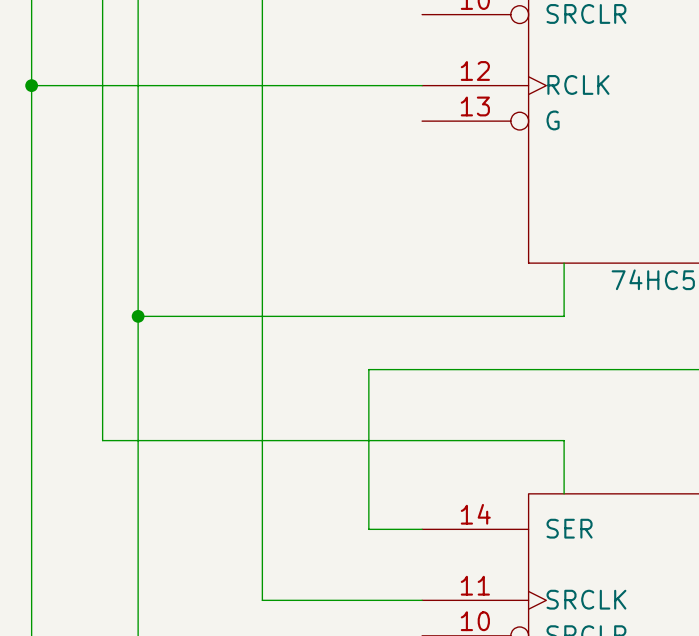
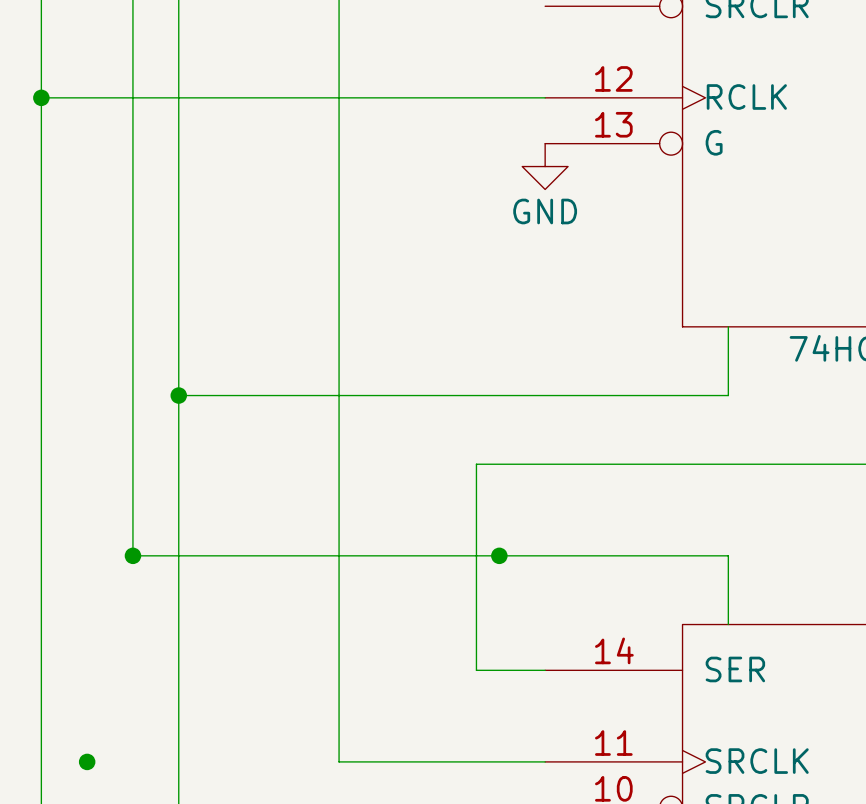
power symbol: none -> GND (545, 166)
junction: none -> (132, 555)
junction: none -> (499, 555)
junction: none -> (87, 761)

